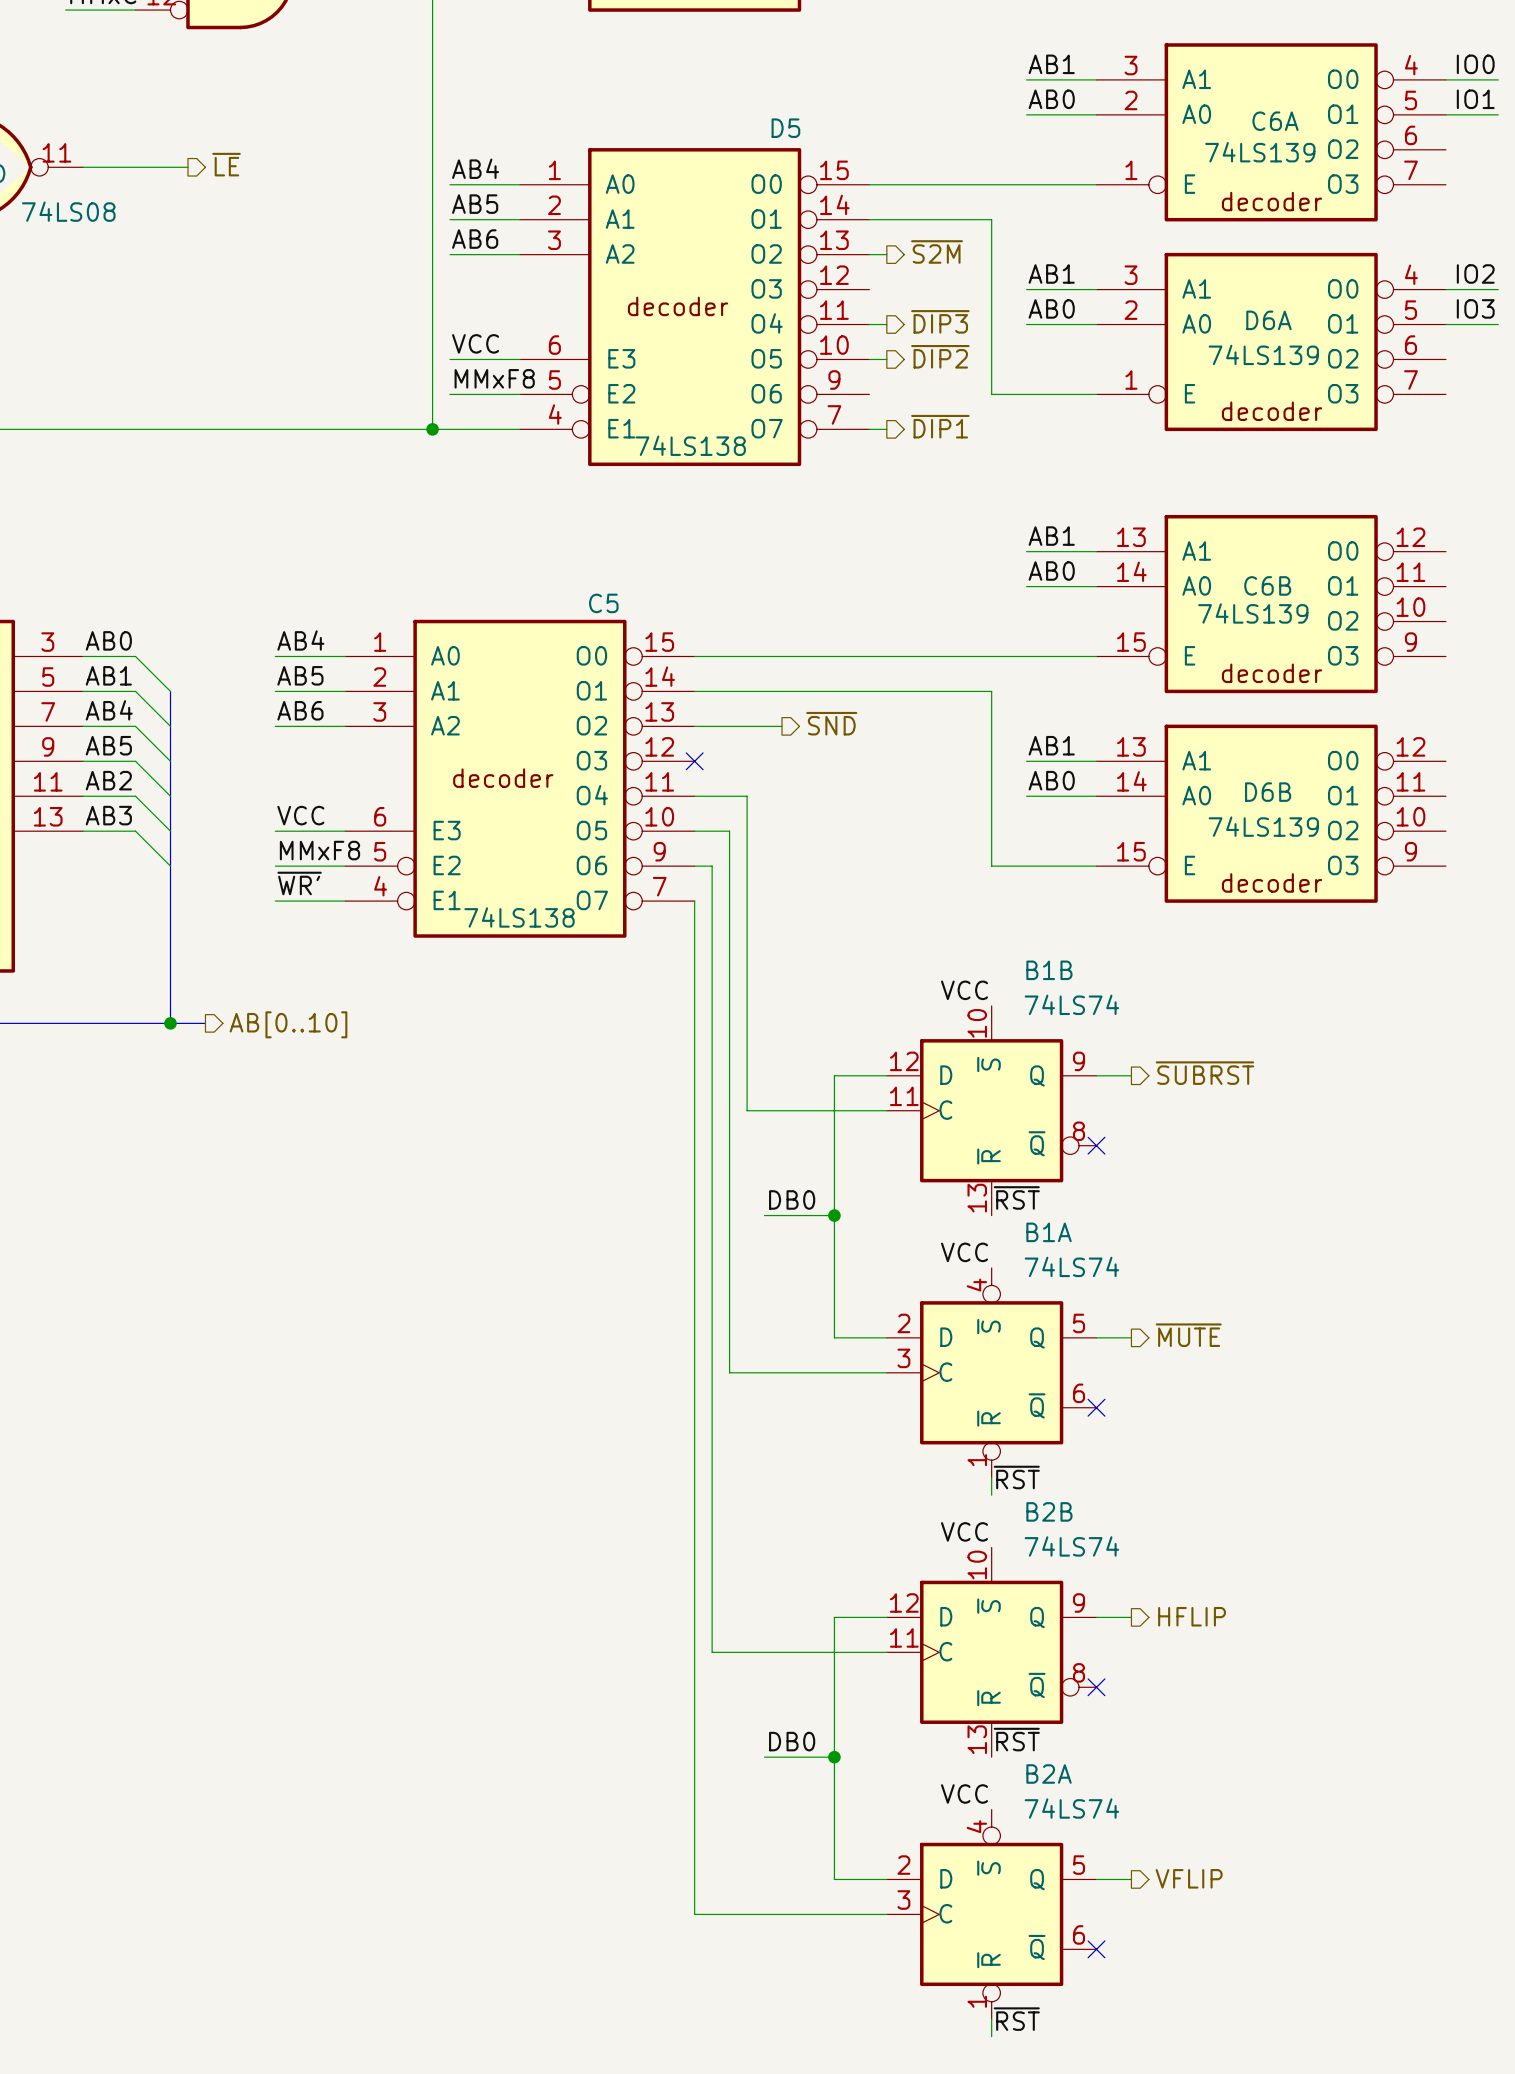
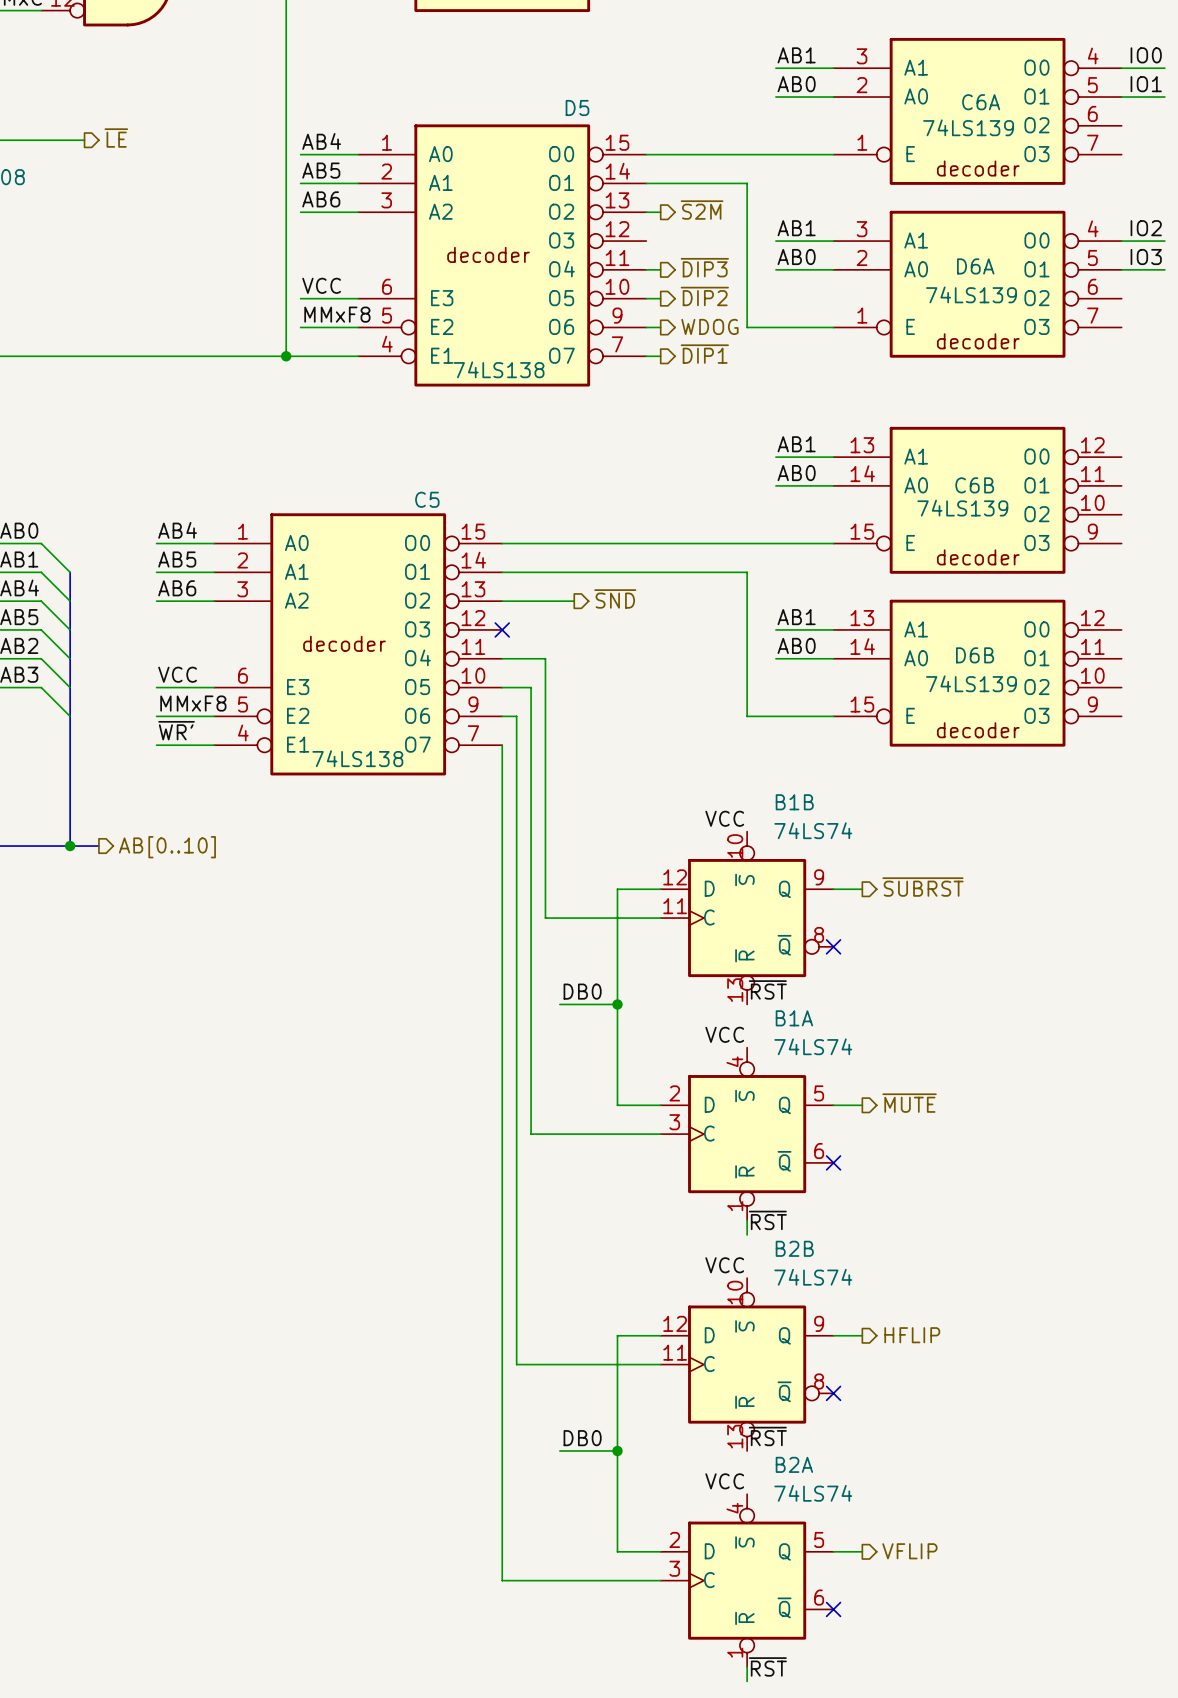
hierarchical label: none -> WDOG (709, 326)
wire: none -> (646, 327) (660, 327)
B1B symbol: [886, 1005, 1097, 1216] -> [660, 831, 834, 1005]
B2B symbol: [886, 1547, 1097, 1758] -> [660, 1278, 834, 1451]

